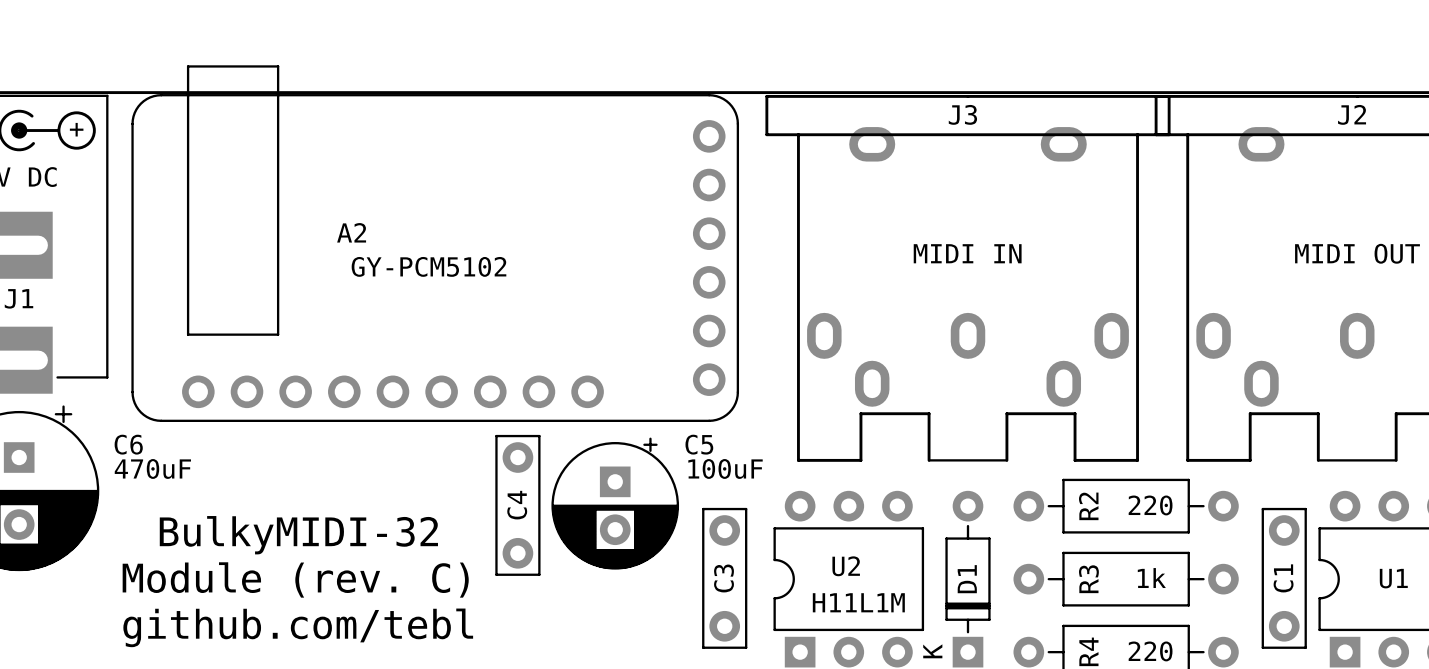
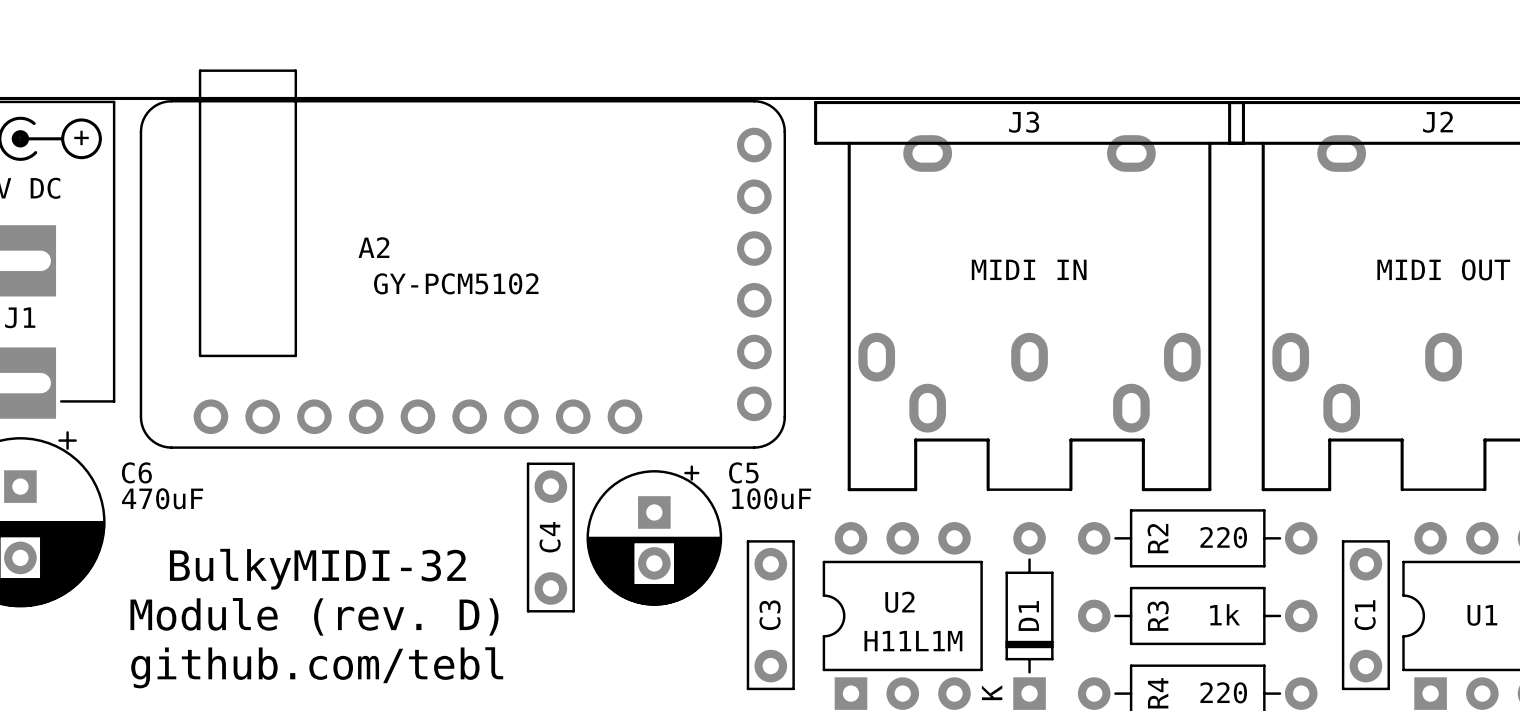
text: Module (rev. C) (295, 579) -> Module (rev. D) (314, 616)

